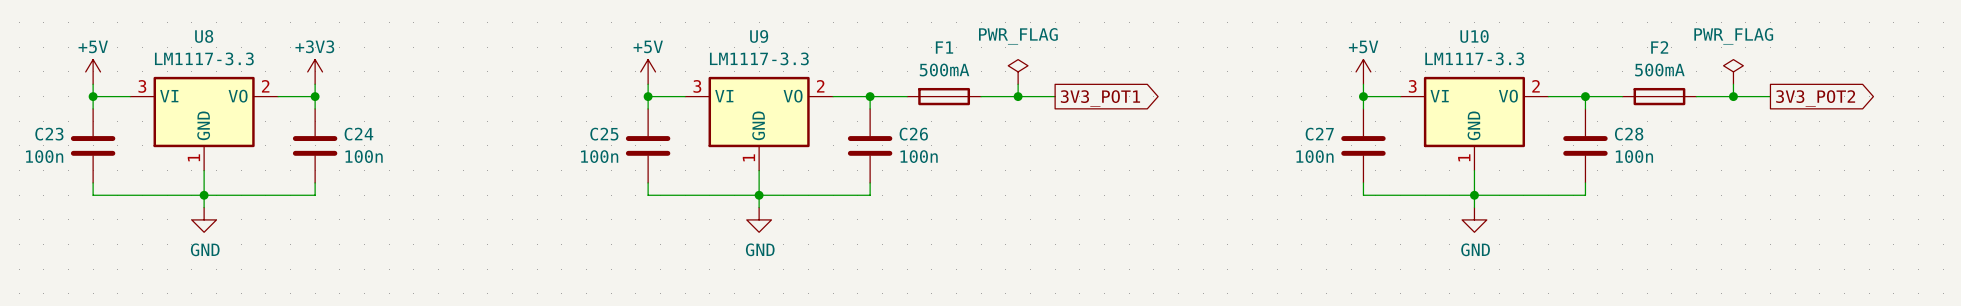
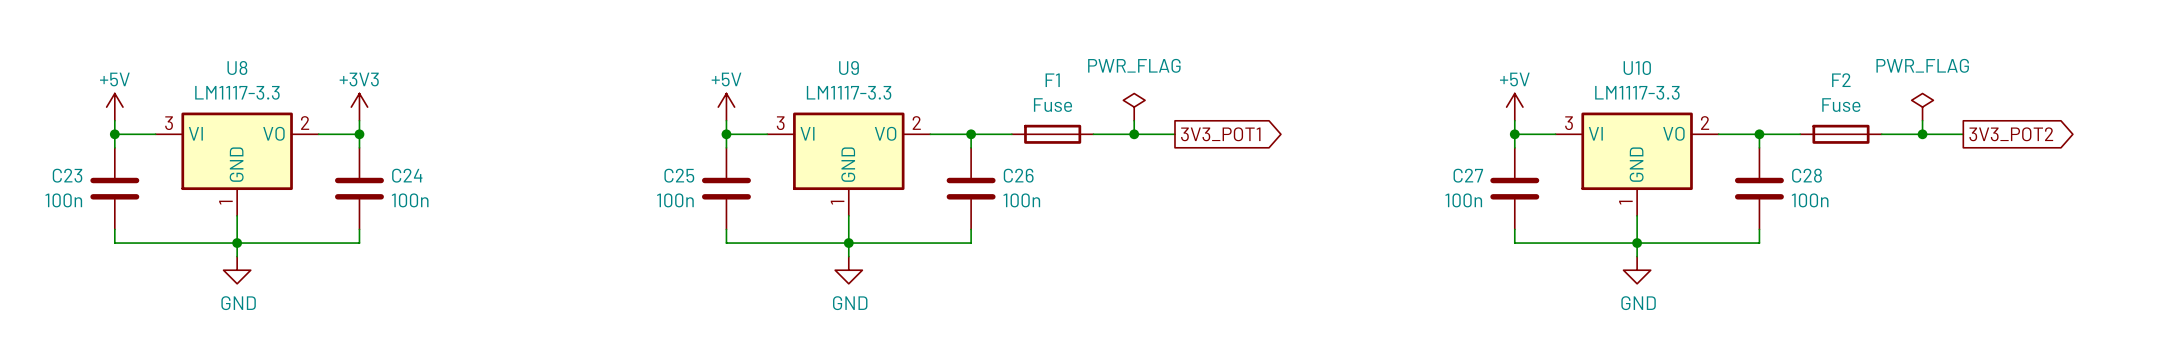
F1 value: 500mA (944, 70) -> Fuse (1052, 105)
F2 value: 500mA (1659, 70) -> Fuse (1841, 105)

